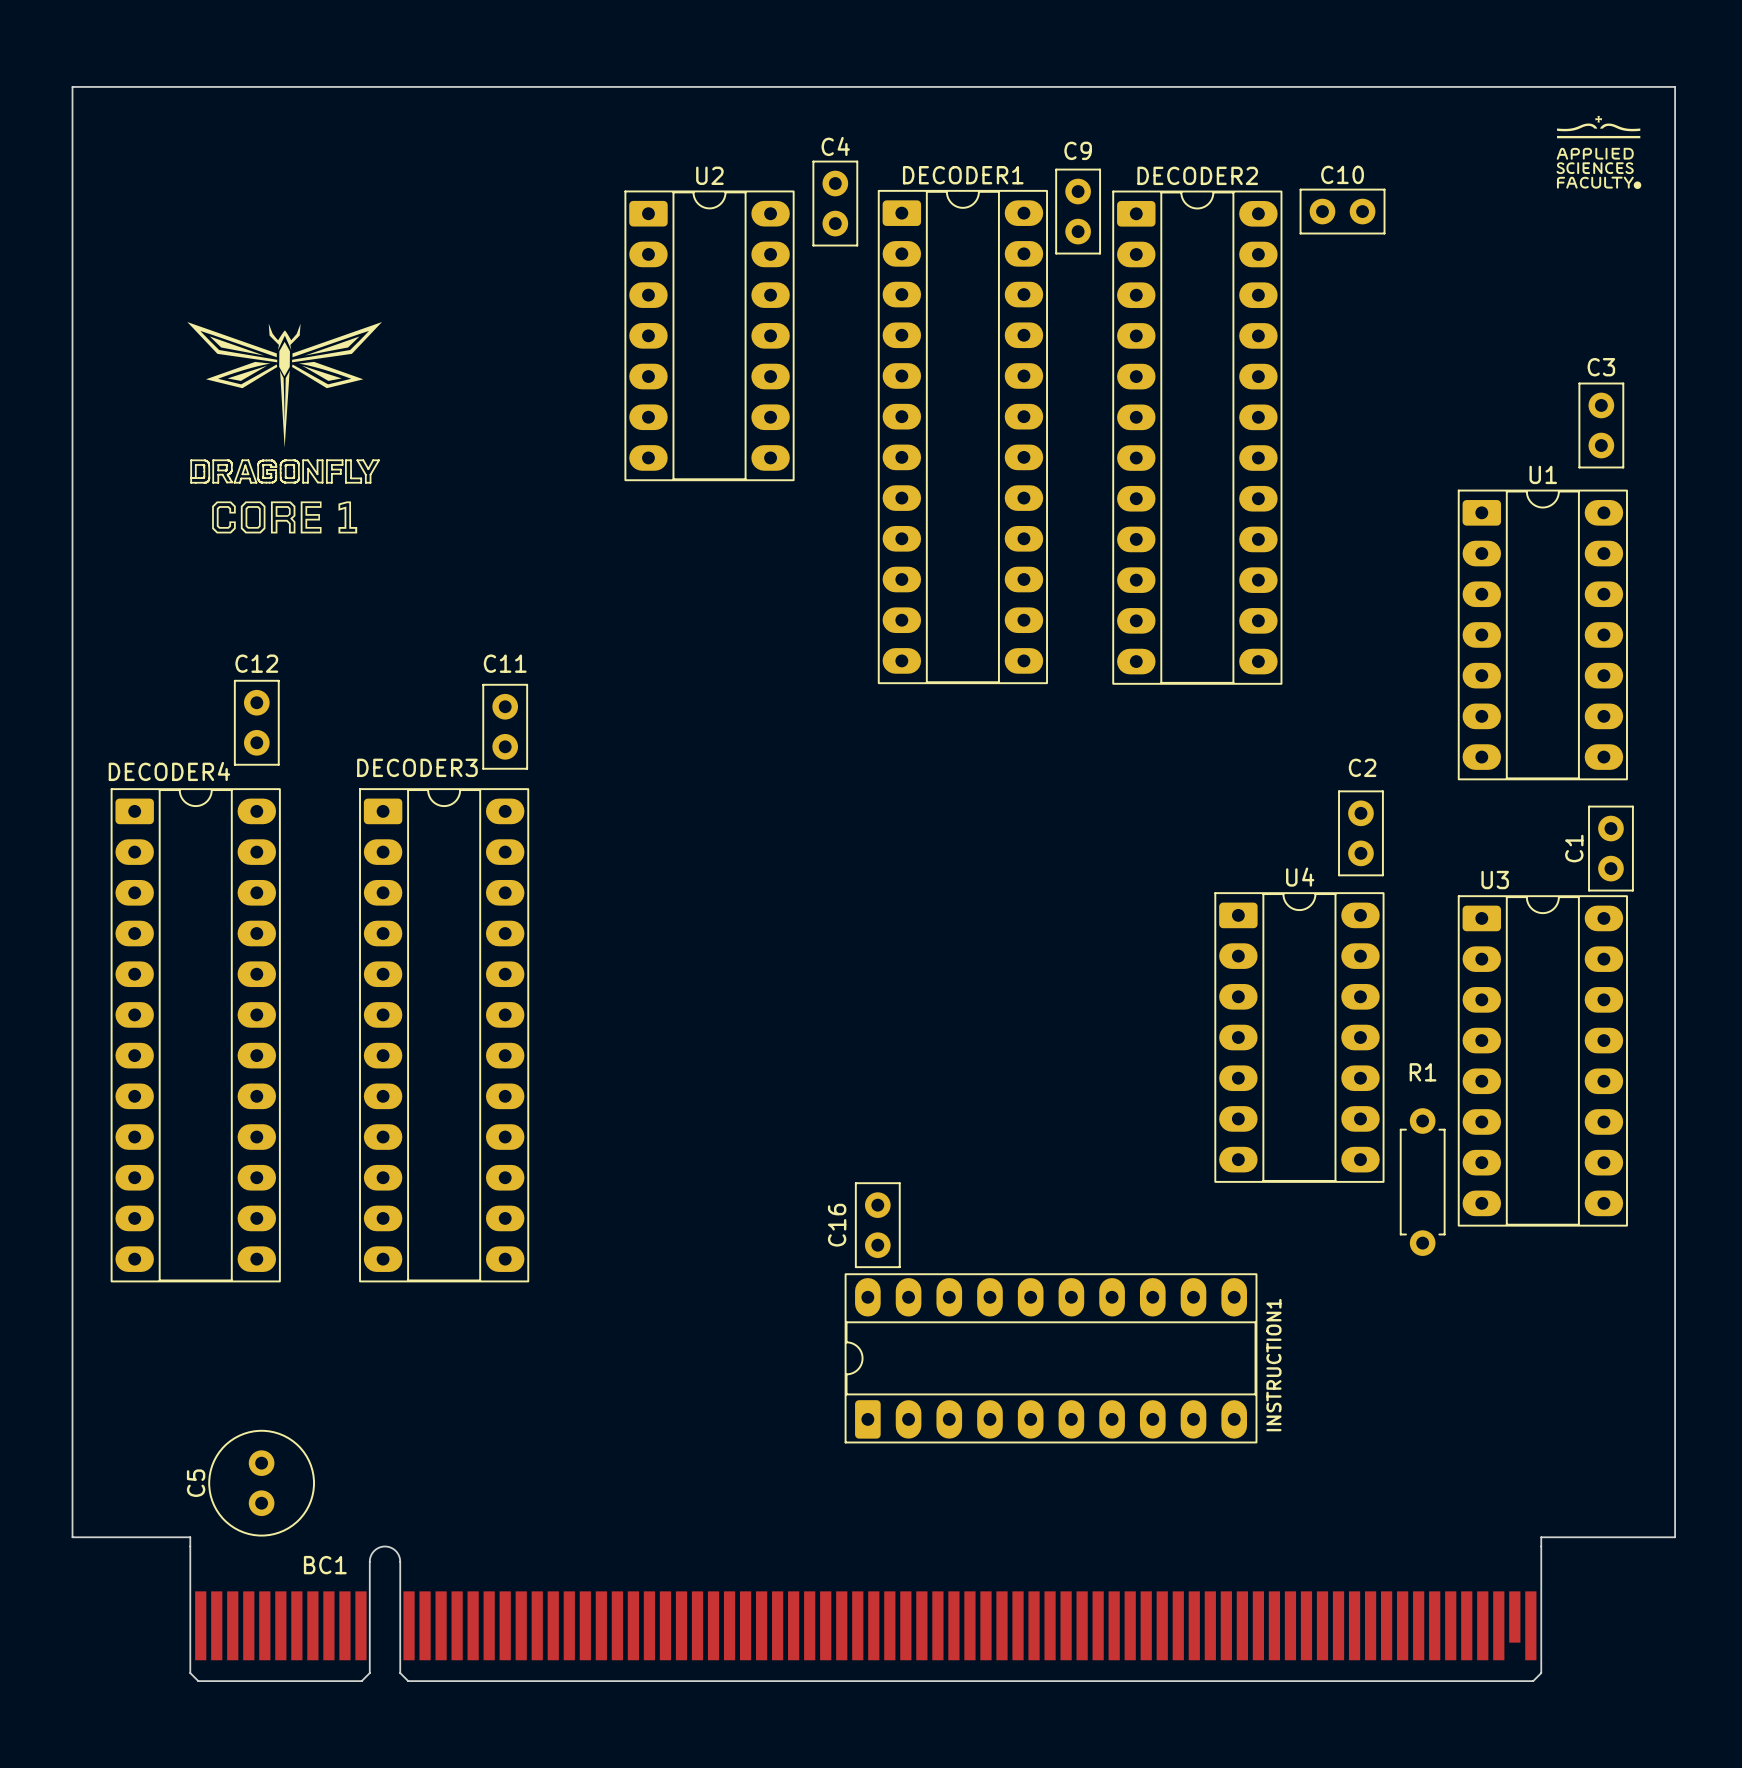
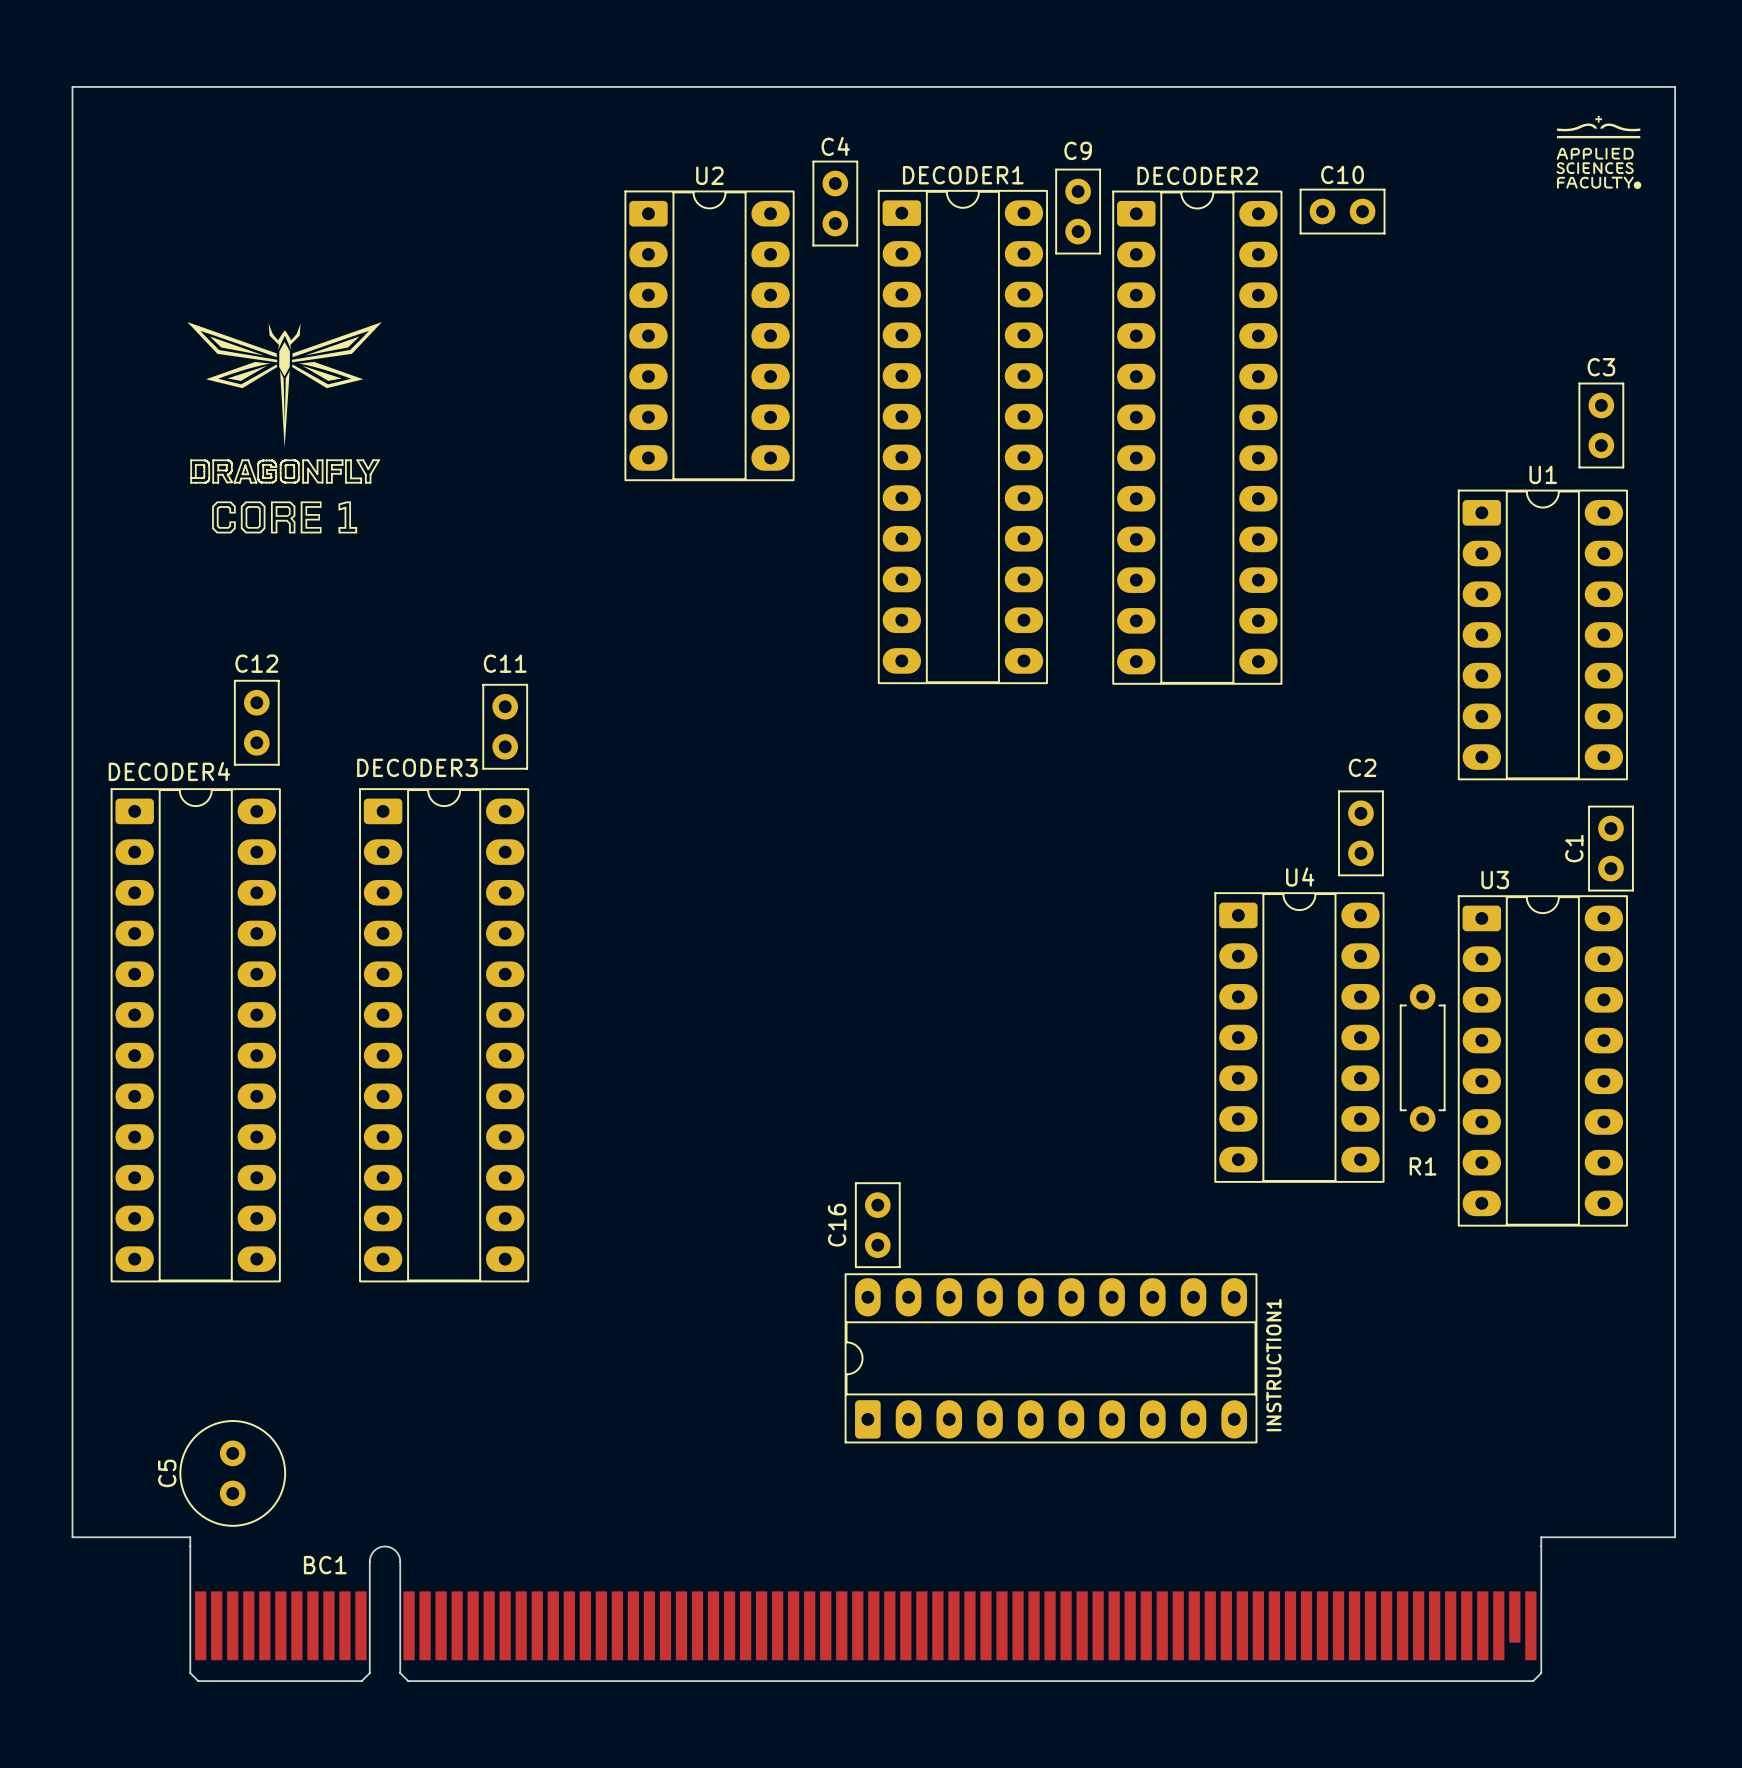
R1 name position: R1 (1423, 1072) -> R1 (1423, 1166)
R1 position: (1422, 1182) -> (1422, 1057)
C5 position: (261, 1483) -> (232, 1473)

